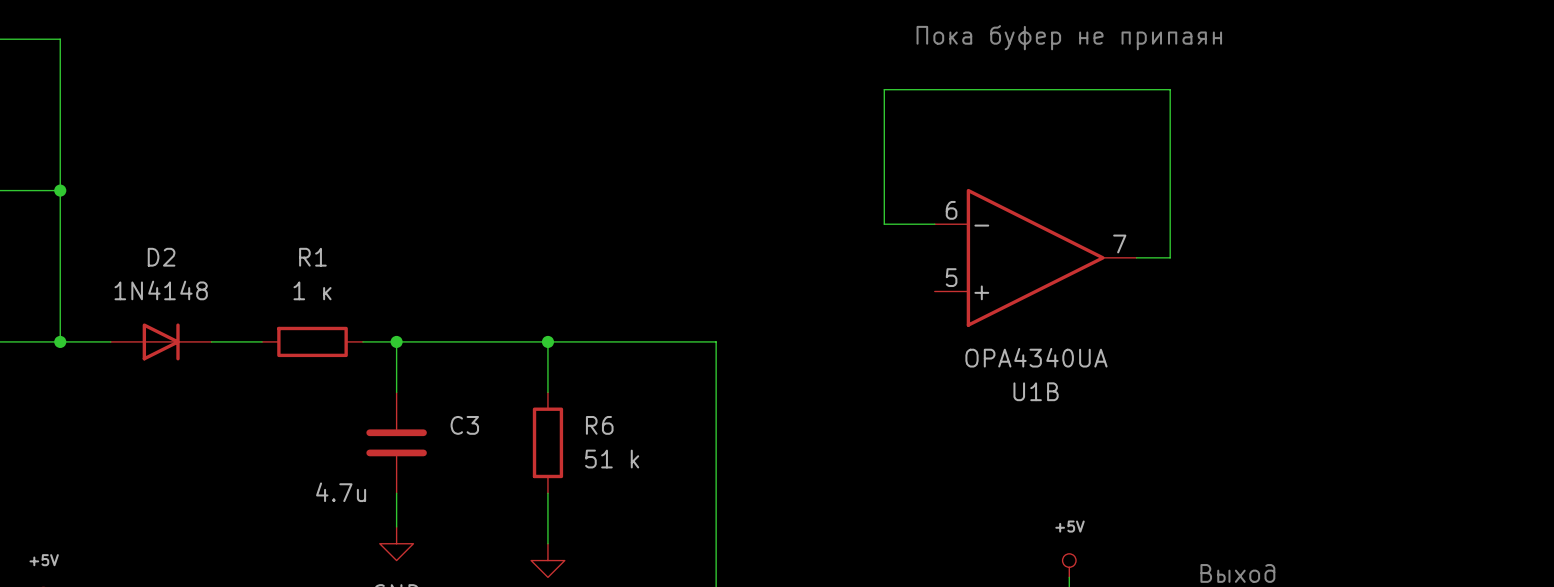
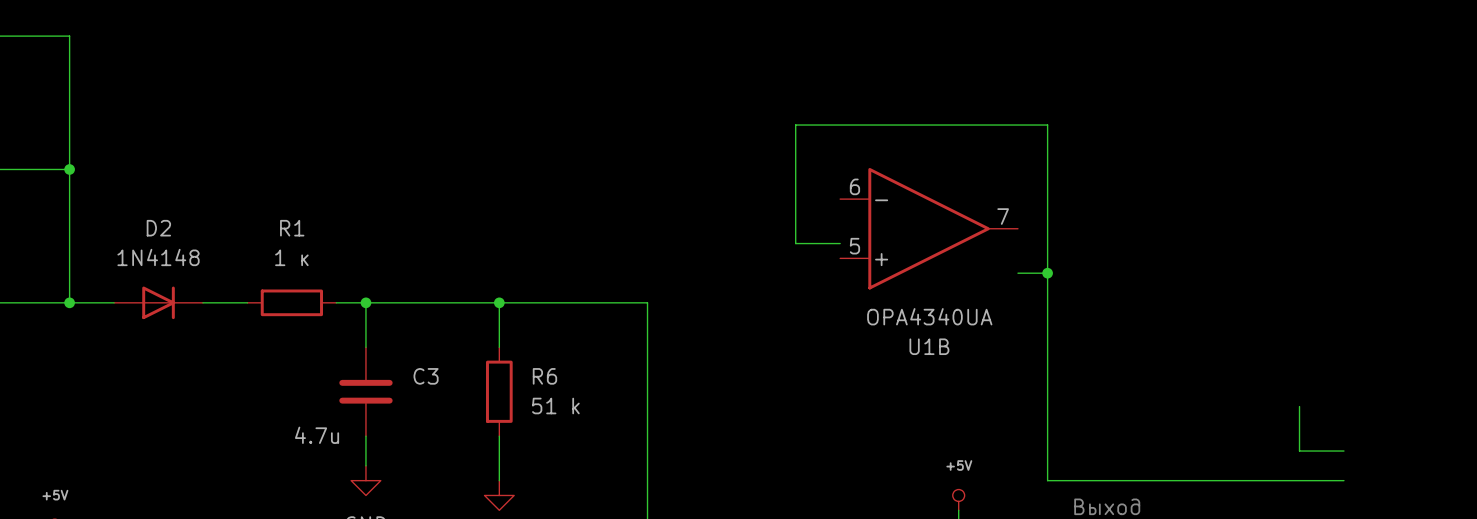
text: Пока буфер не припаян (1069, 37) -> none
wire: (884, 140) (884, 89) (1170, 89) (1170, 140) -> (795, 125) (1047, 125)
wire: (884, 224) (934, 224) -> (795, 199) (795, 243) (840, 243)
wire: (1136, 257) (1170, 257) -> (1343, 480) (1047, 480) (1047, 228)
wire: none -> (1017, 273) (1047, 273)
junction: none -> (1047, 273)
wire: none -> (1299, 406) (1299, 451) (1343, 451)

